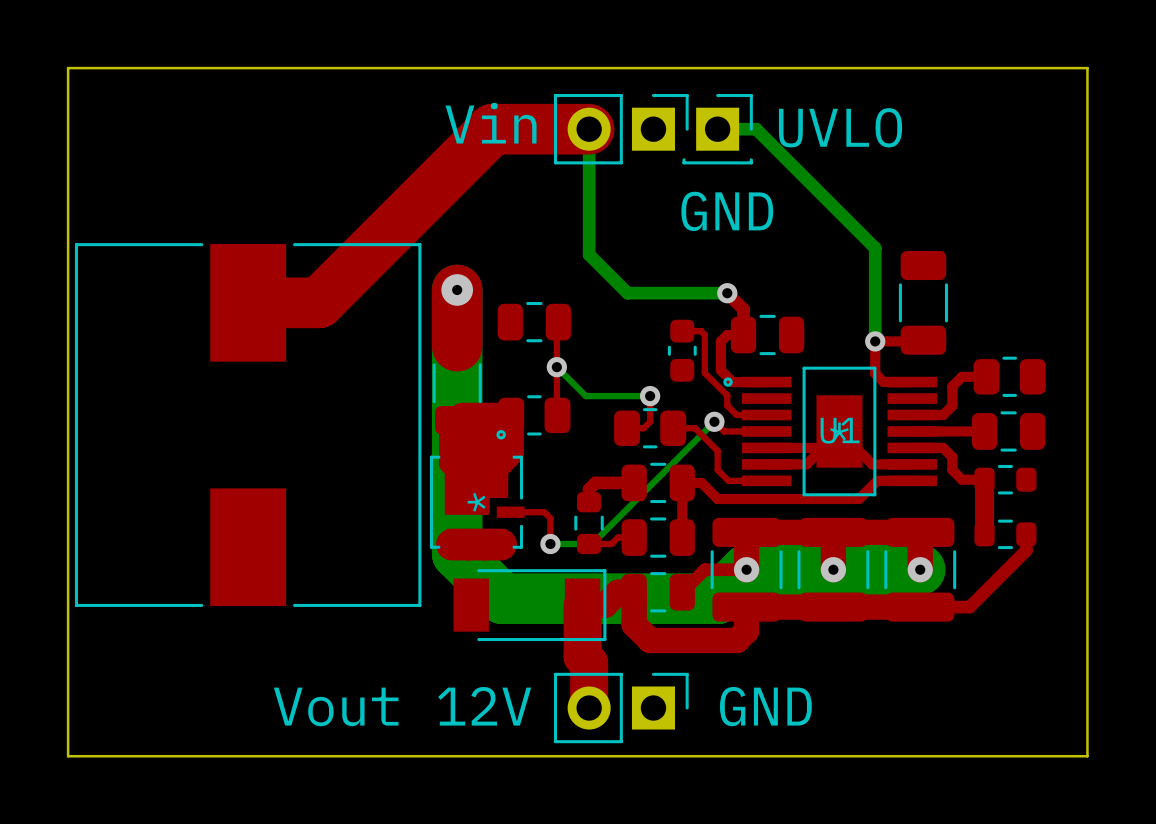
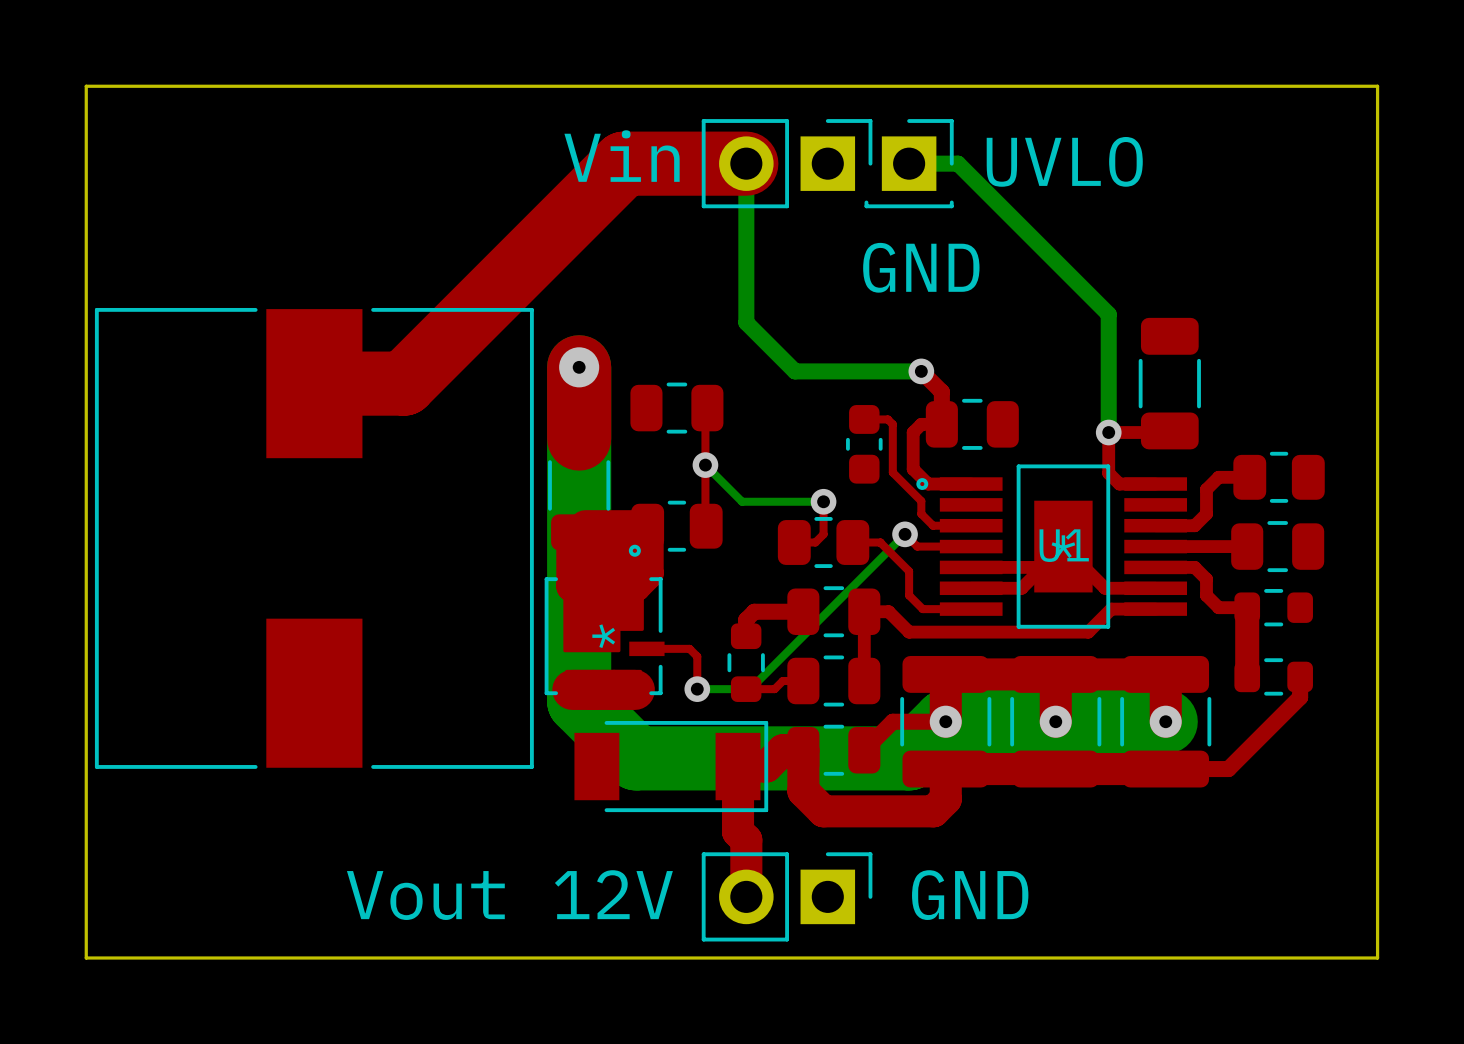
top track width: thick (582, 605) (582, 656) (589, 663) (589, 708) -> thin (738, 766) (738, 831) (746, 840) (746, 896)

